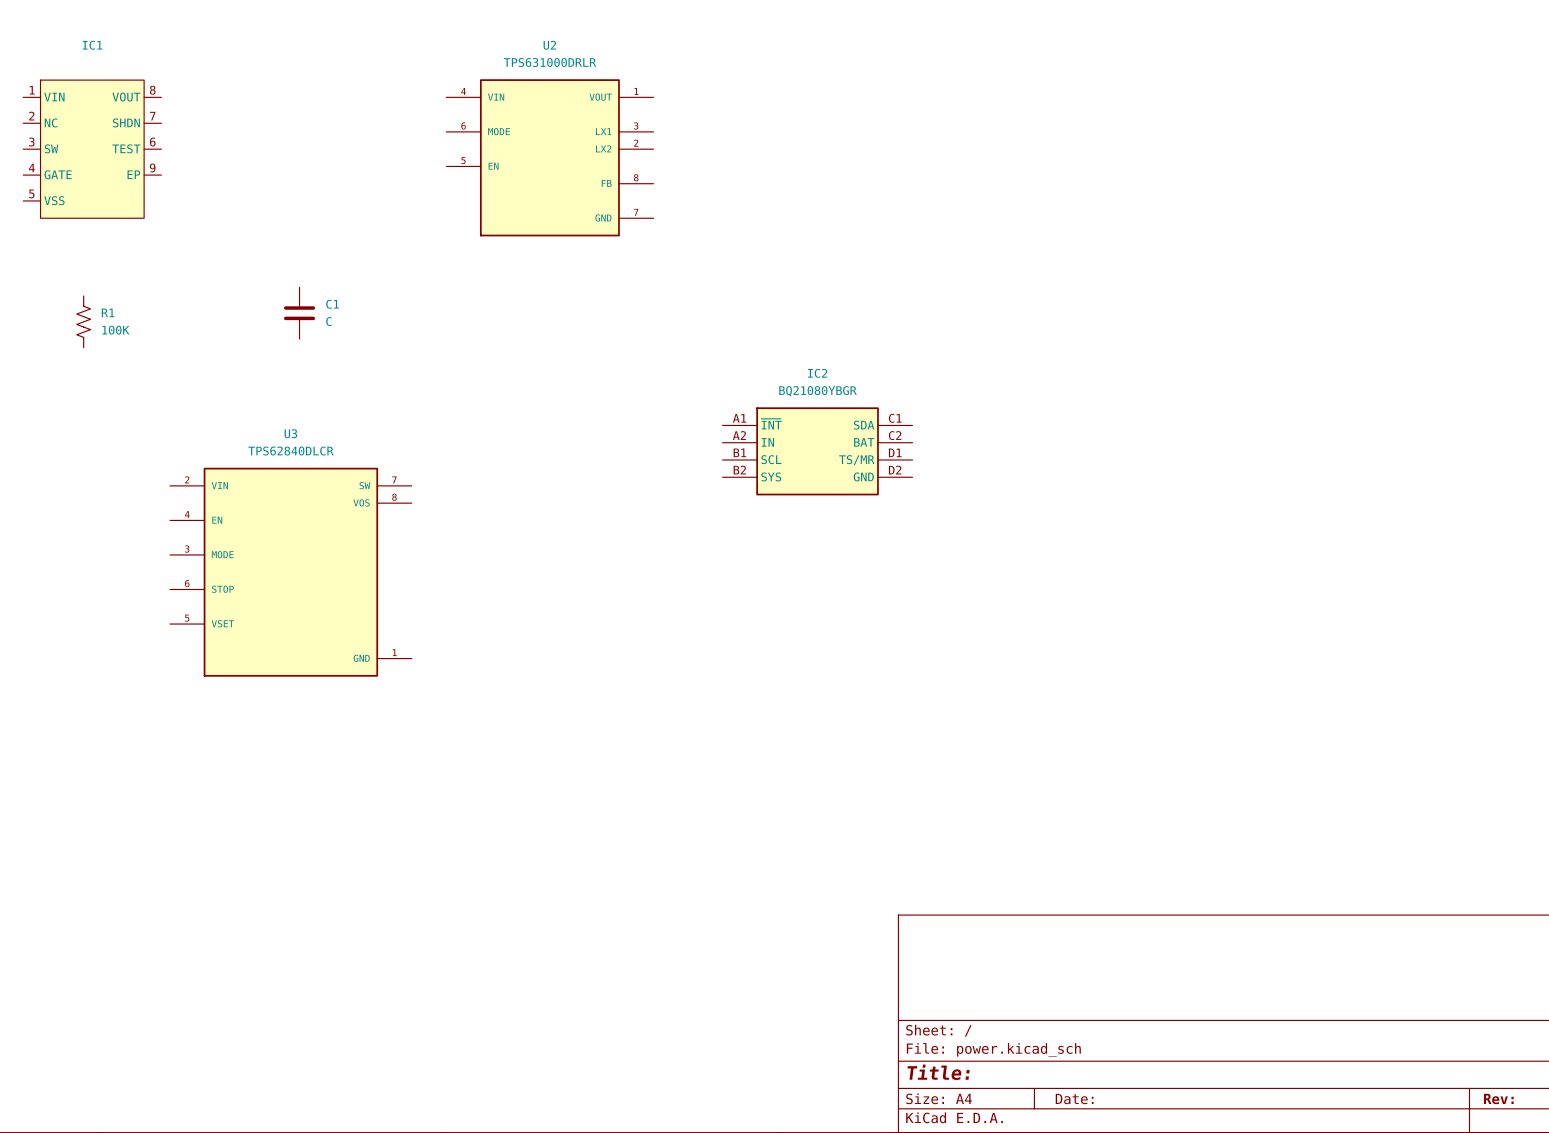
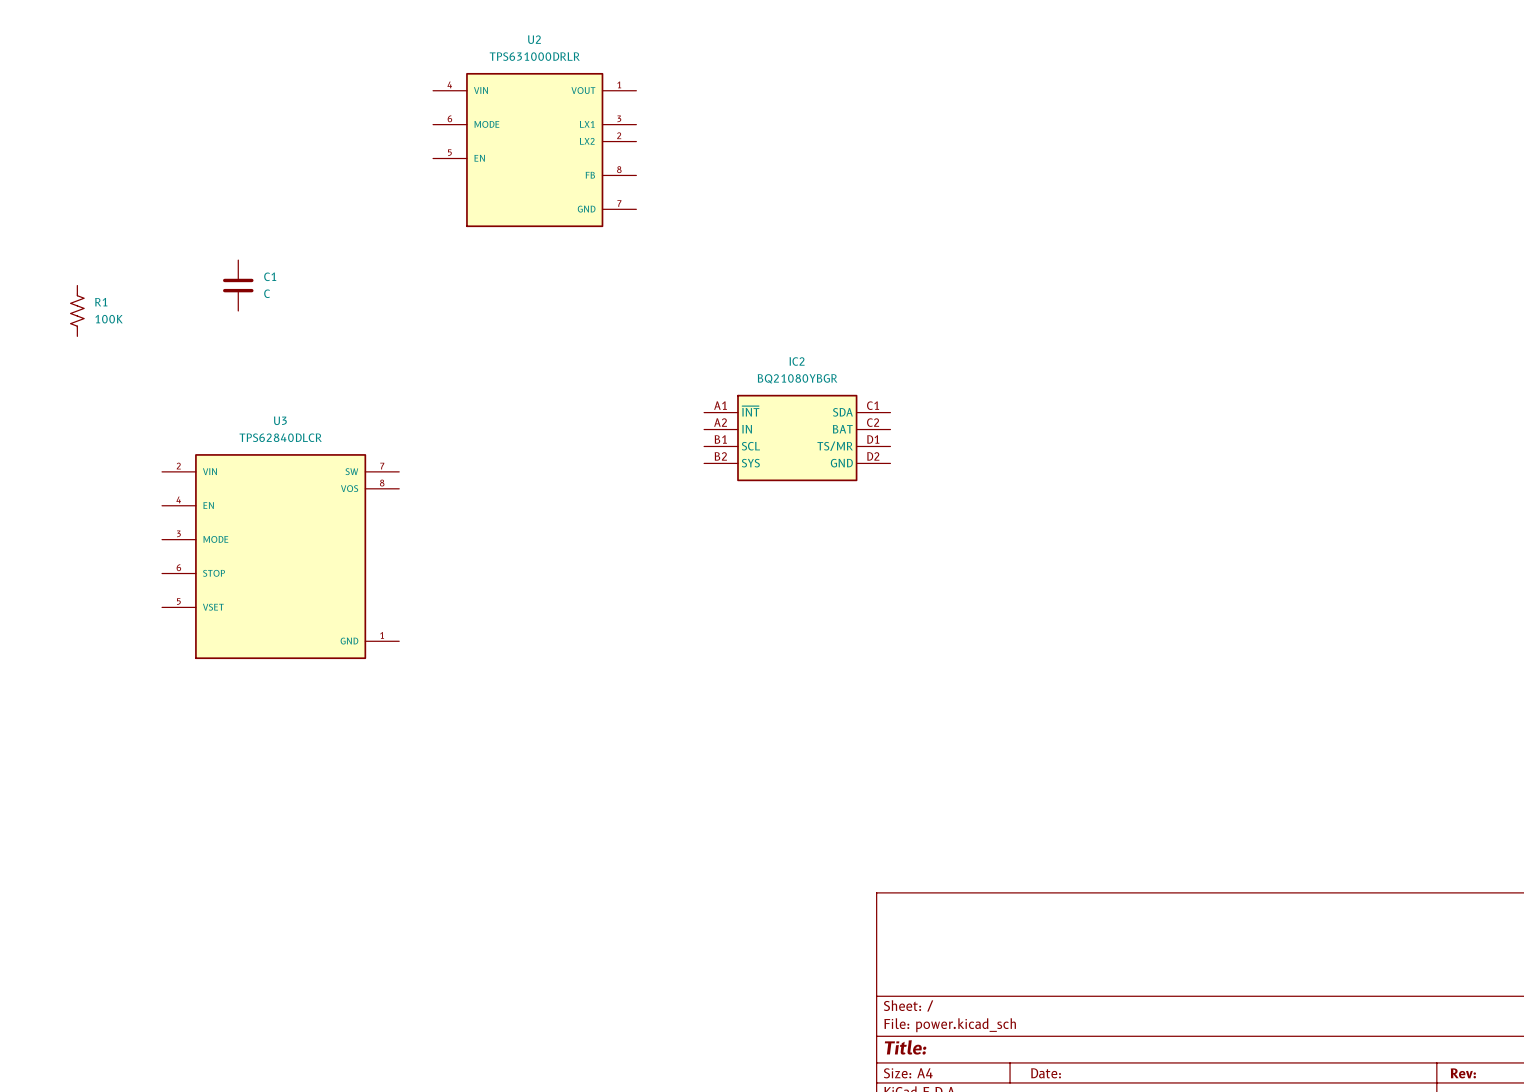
IC1: (92, 149) -> none
C1 position: (299, 313) -> (238, 285)

